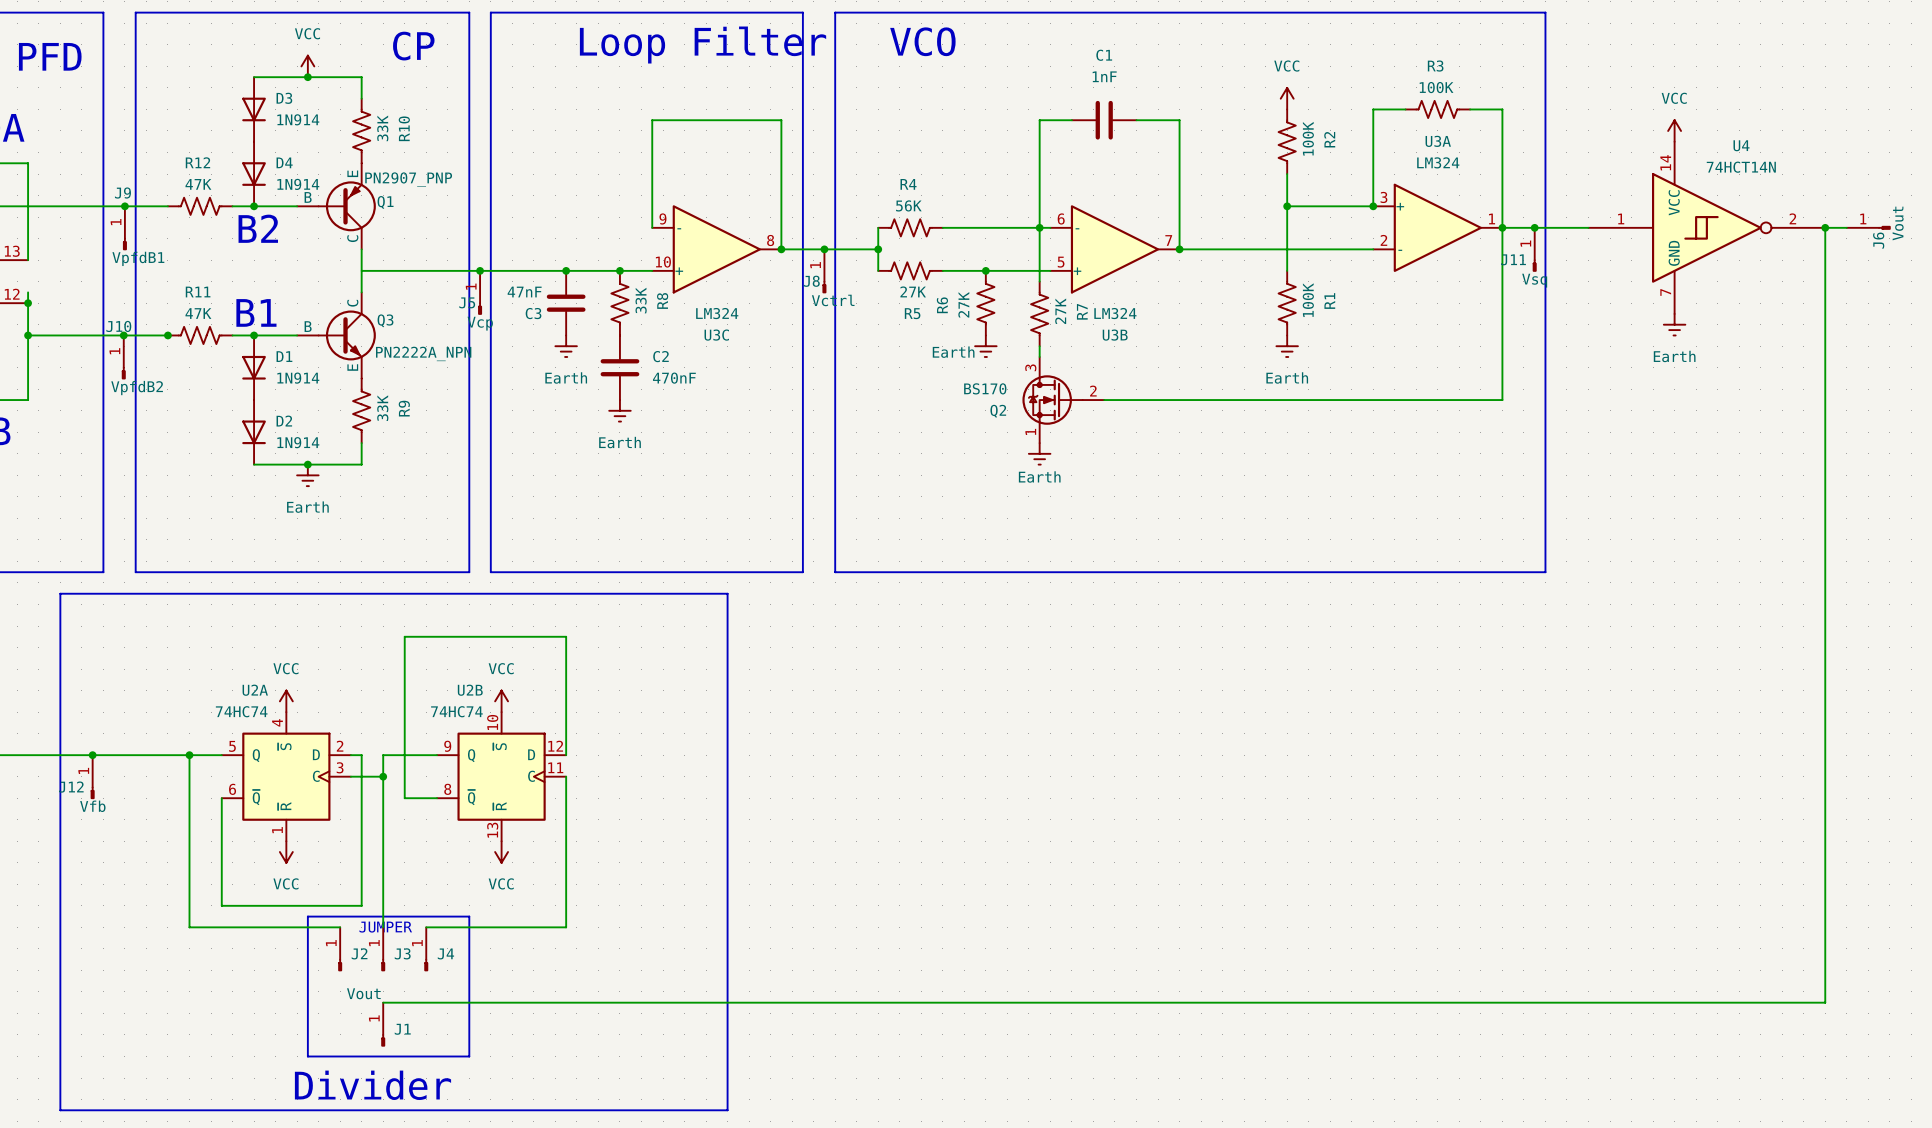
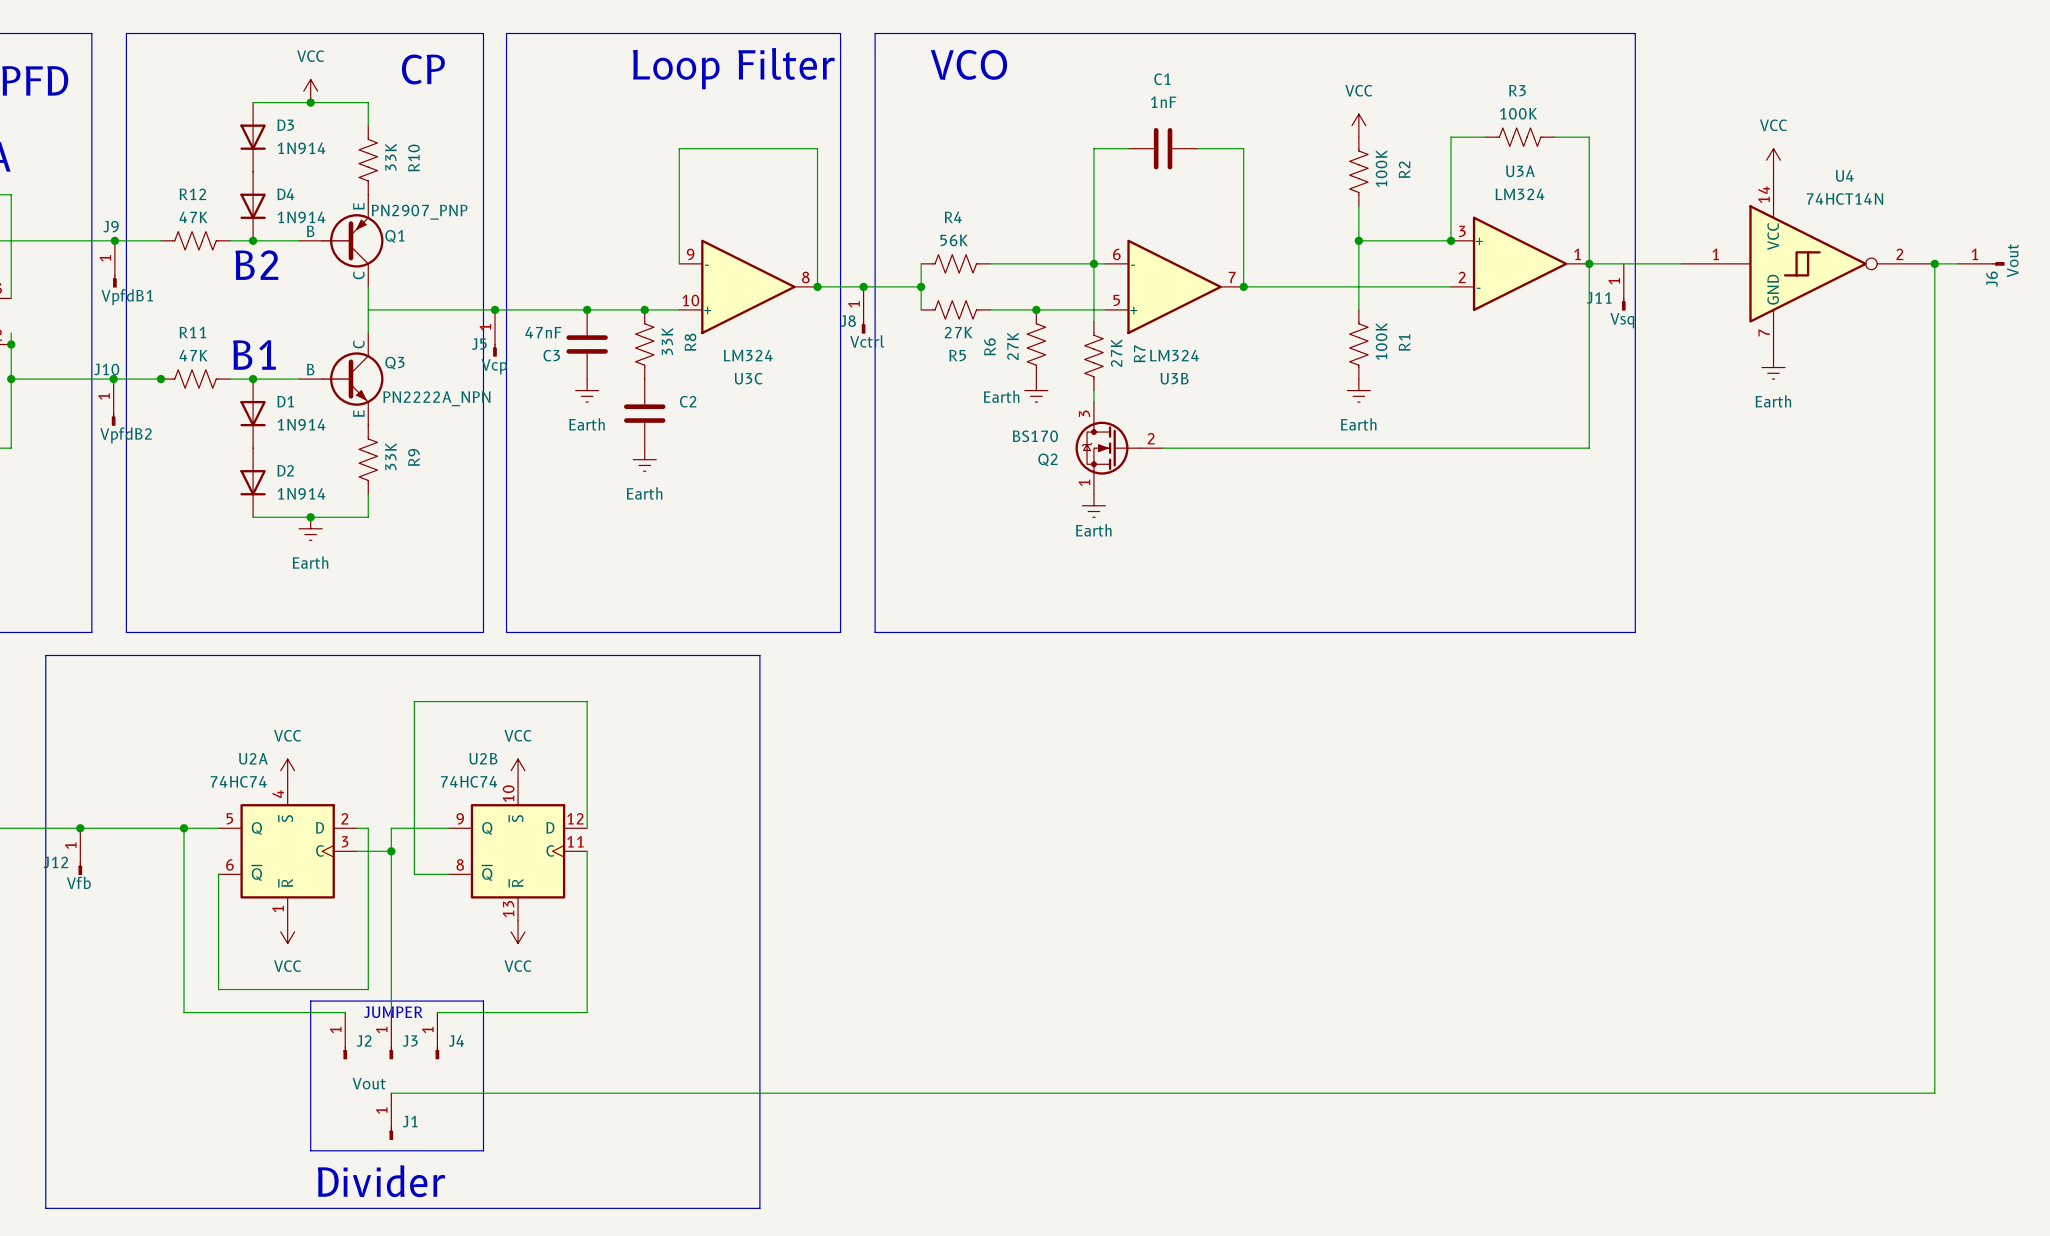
junction: (1534, 227) -> none
C2 value: 470nF (674, 378) -> none

